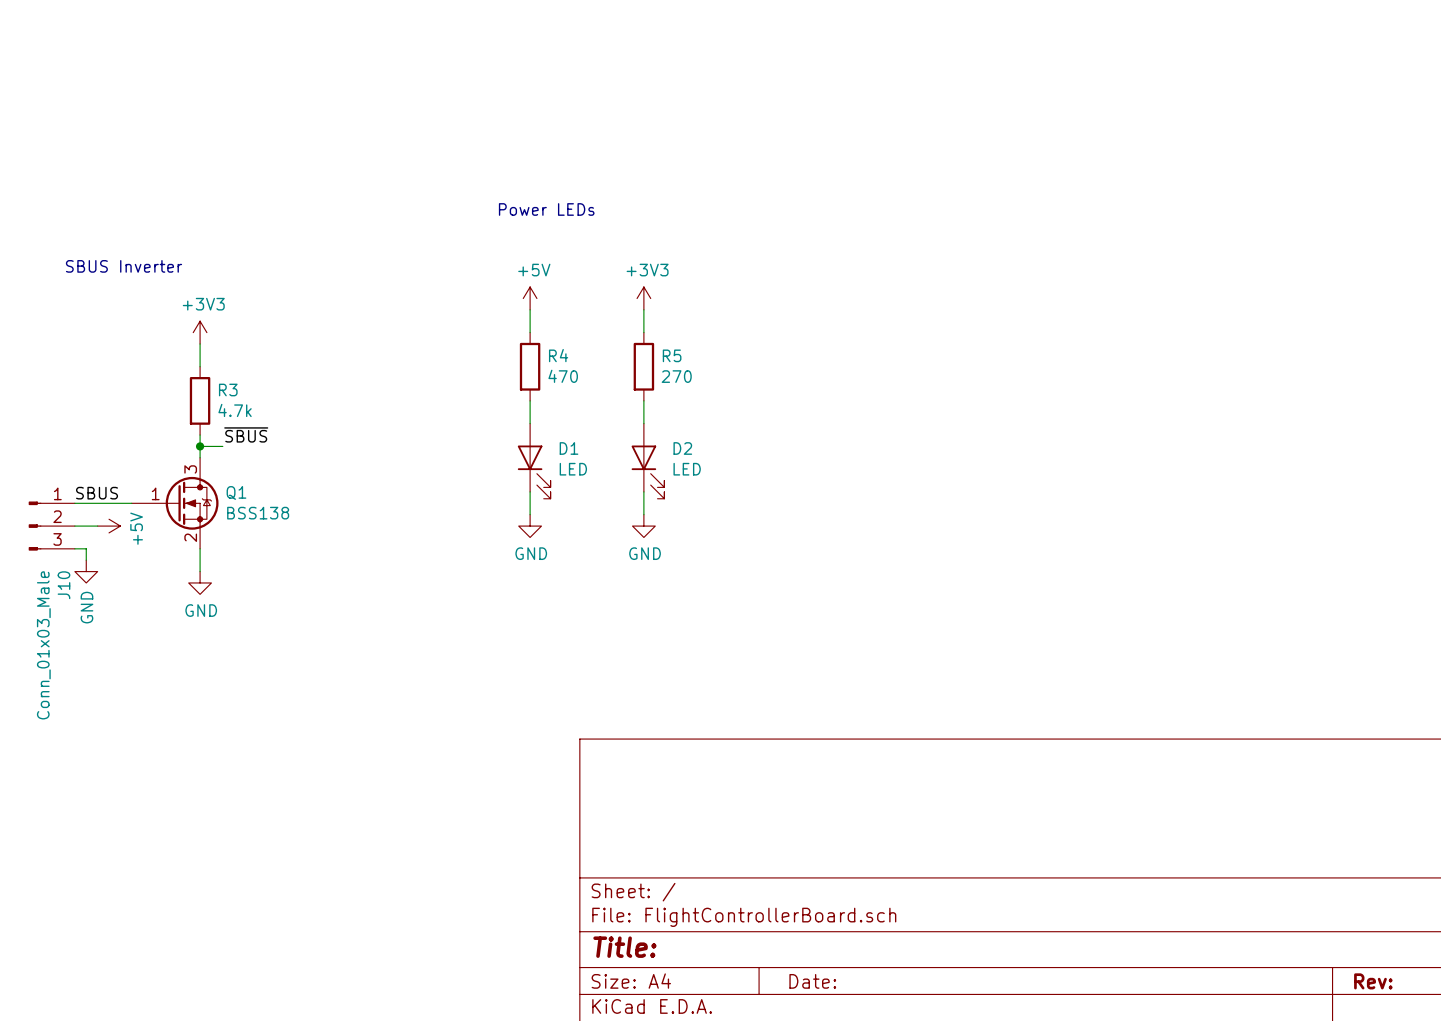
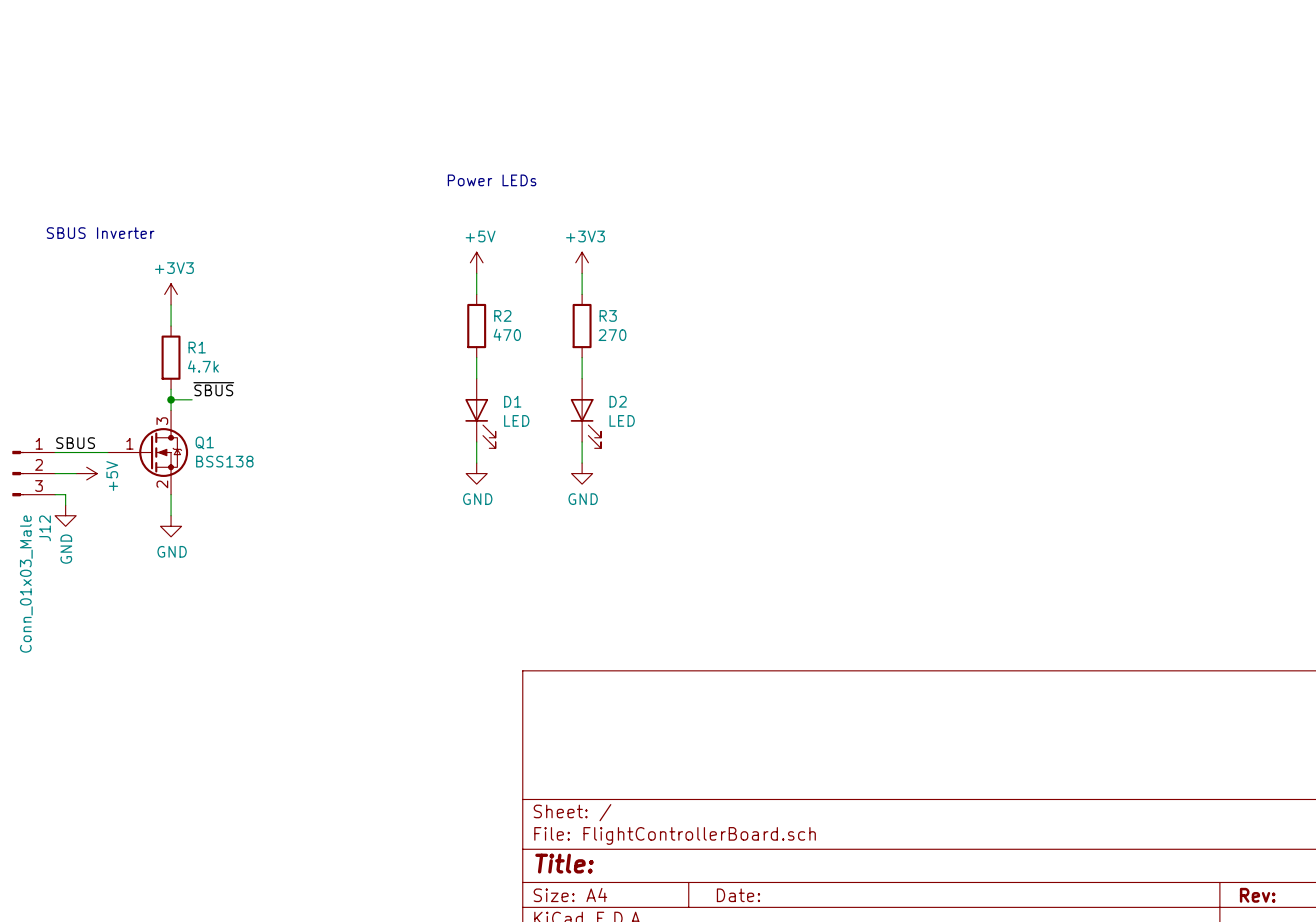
R4 name: R4 (558, 355) -> R2 (502, 315)
R5 name: R5 (672, 355) -> R3 (608, 315)
R3 name: R3 (228, 390) -> R1 (197, 347)
J10 name: J10 (63, 585) -> J12 (45, 528)

